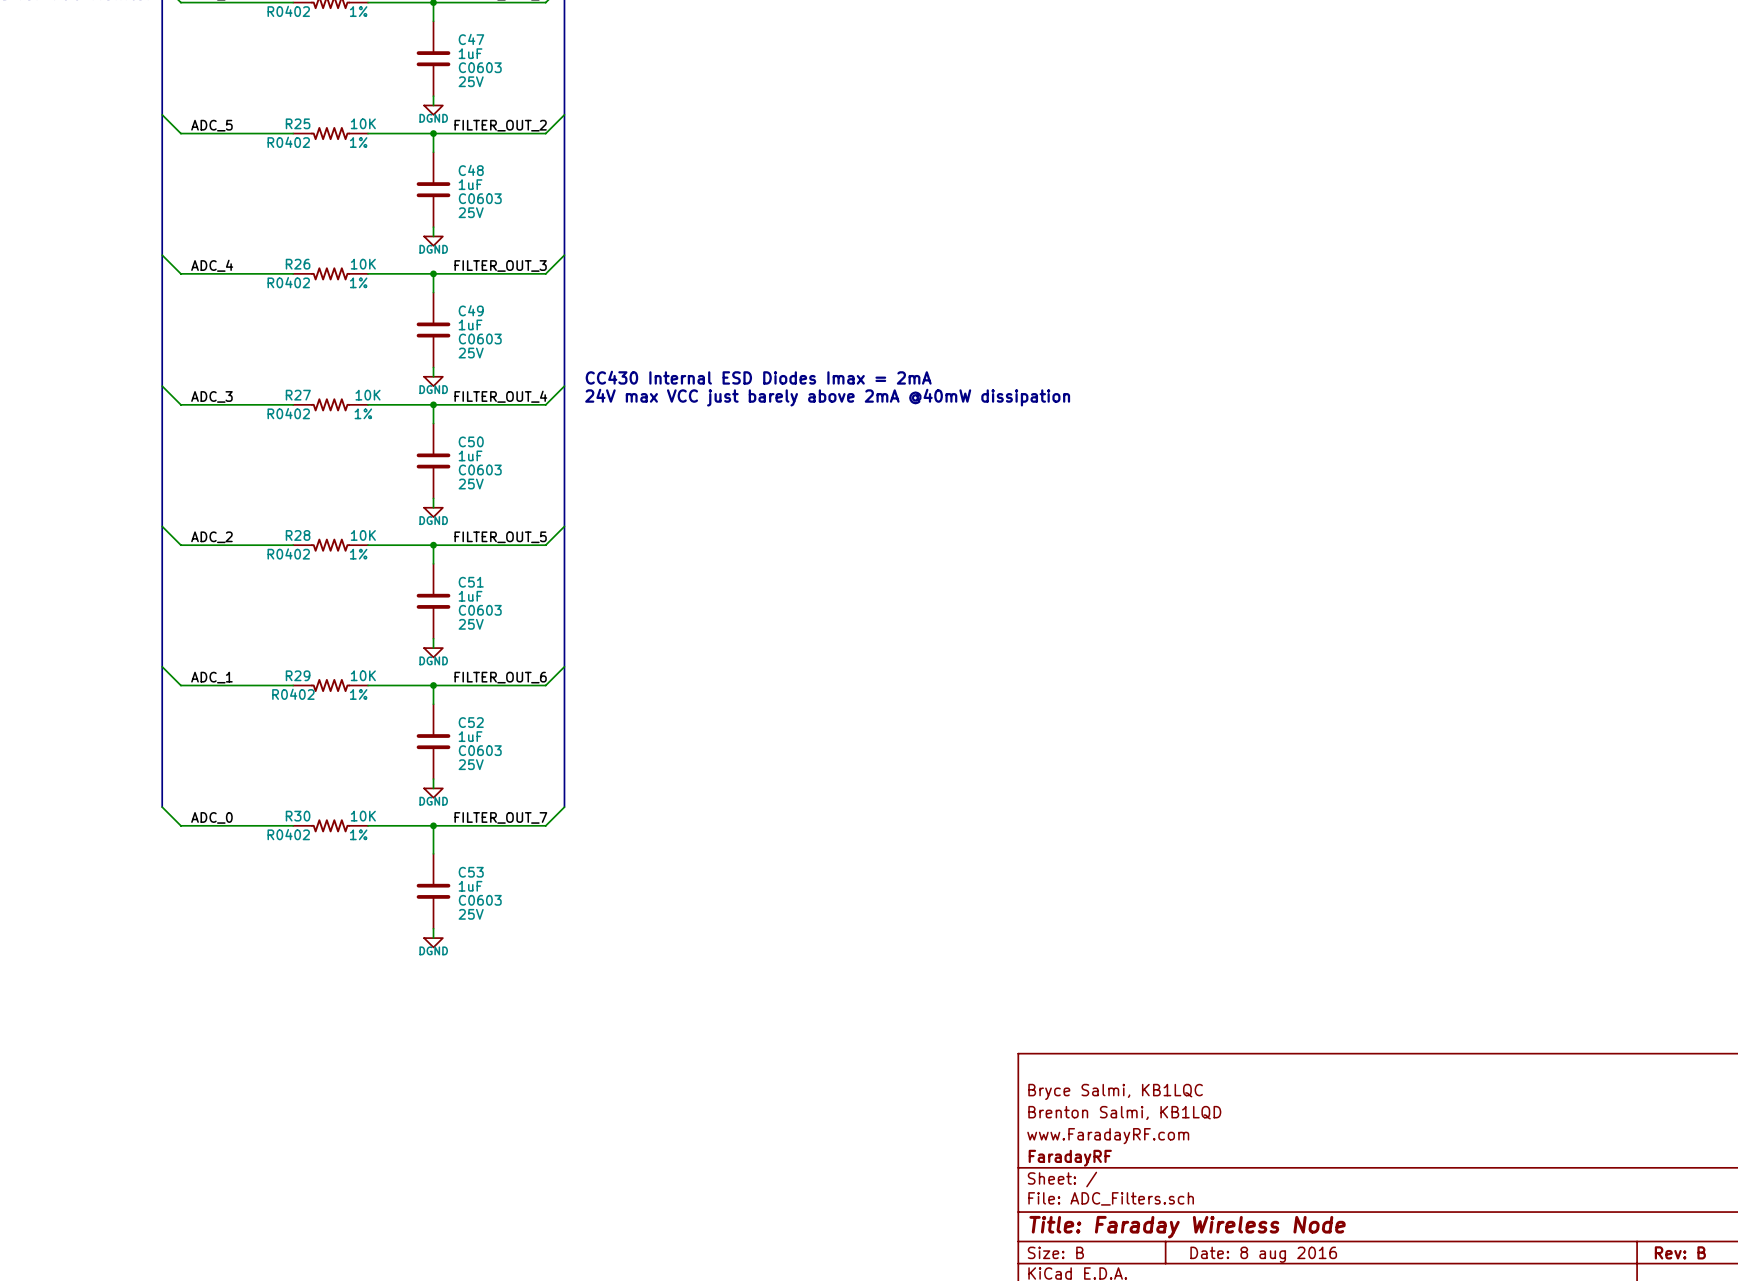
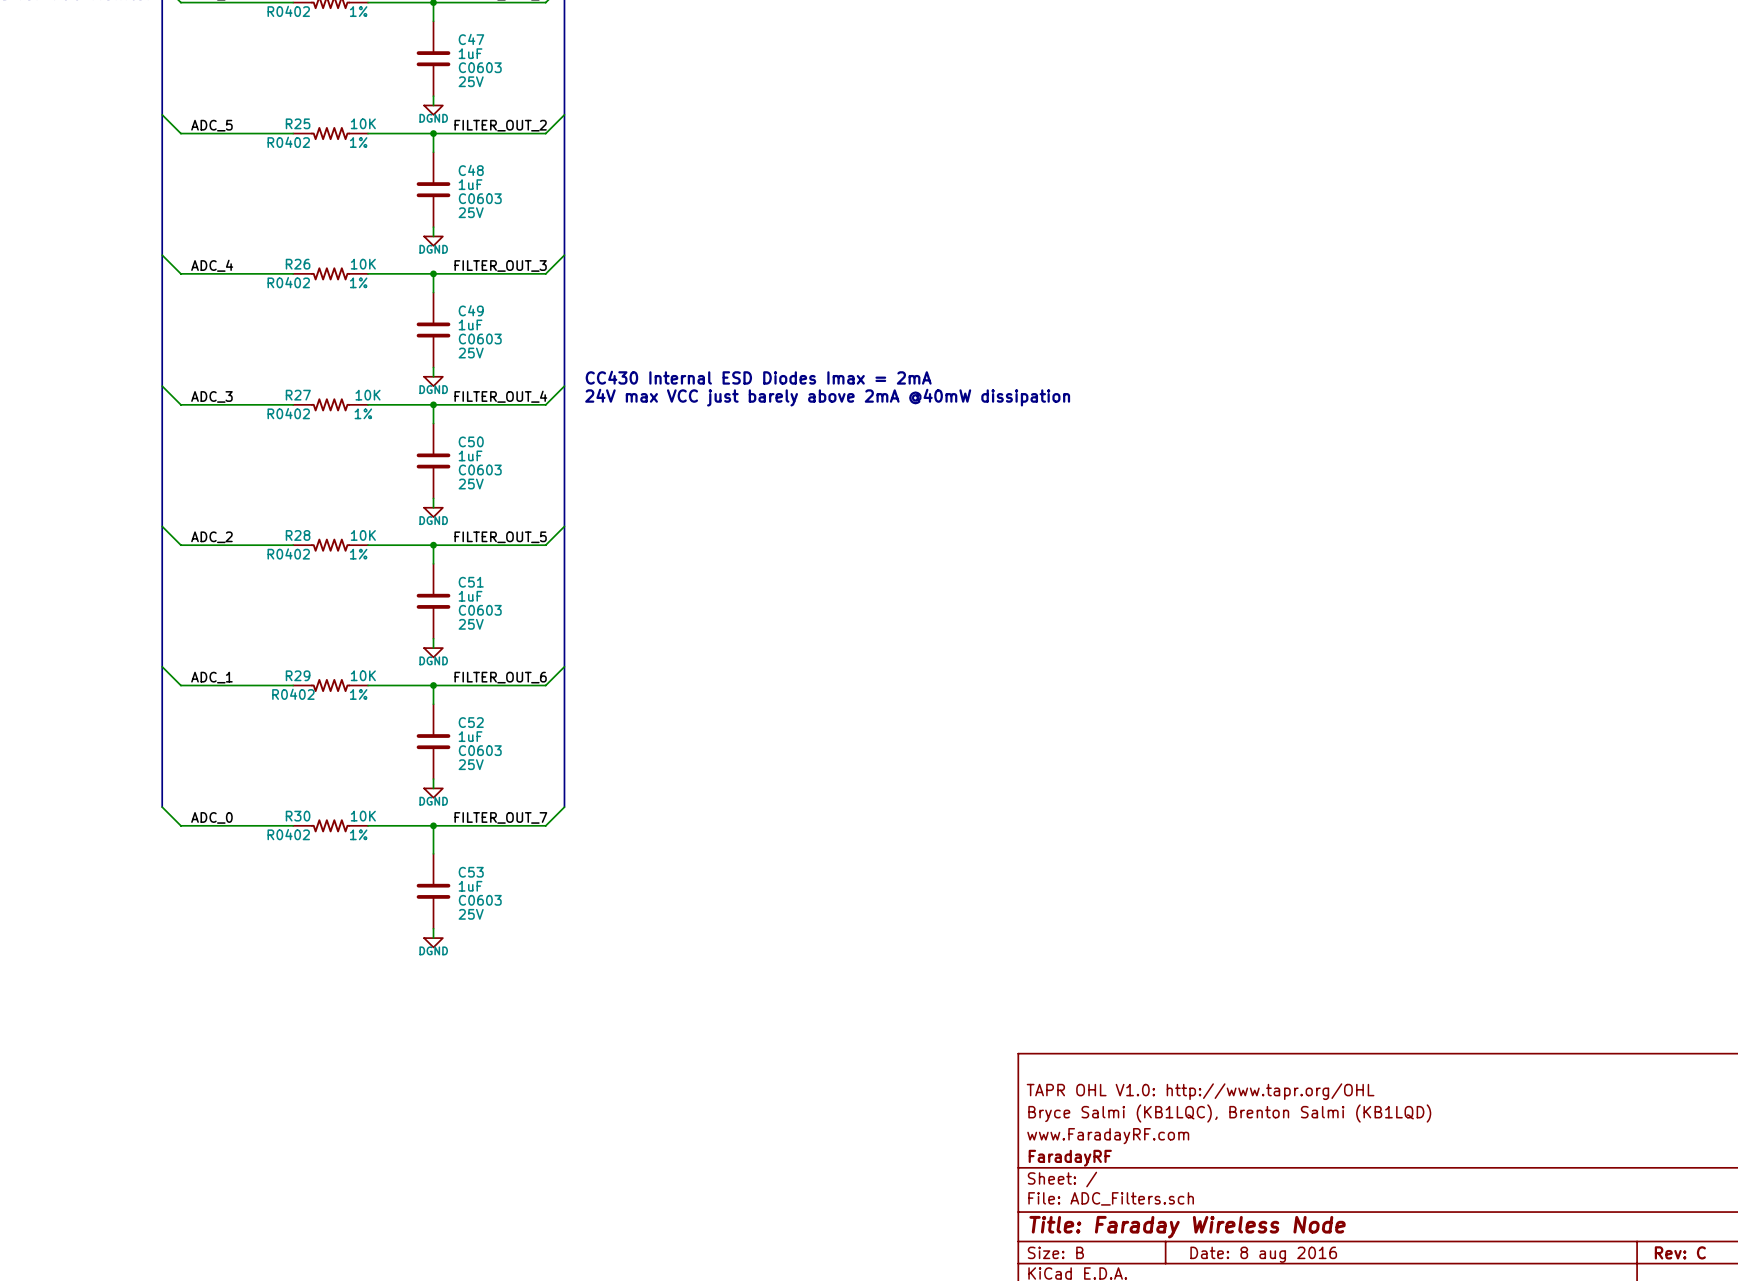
title block: Bryce Salmi, KB1LQC (1115, 1091) -> TAPR OHL V1.0: http://www.tapr.org/OHL (1200, 1091)
title block: Brenton Salmi, KB1LQD (1124, 1112) -> Bryce Salmi (KB1LQC), Brenton Salmi (KB1LQD) (1229, 1113)
title block: Rev: B (1680, 1252) -> Rev: C (1680, 1252)

